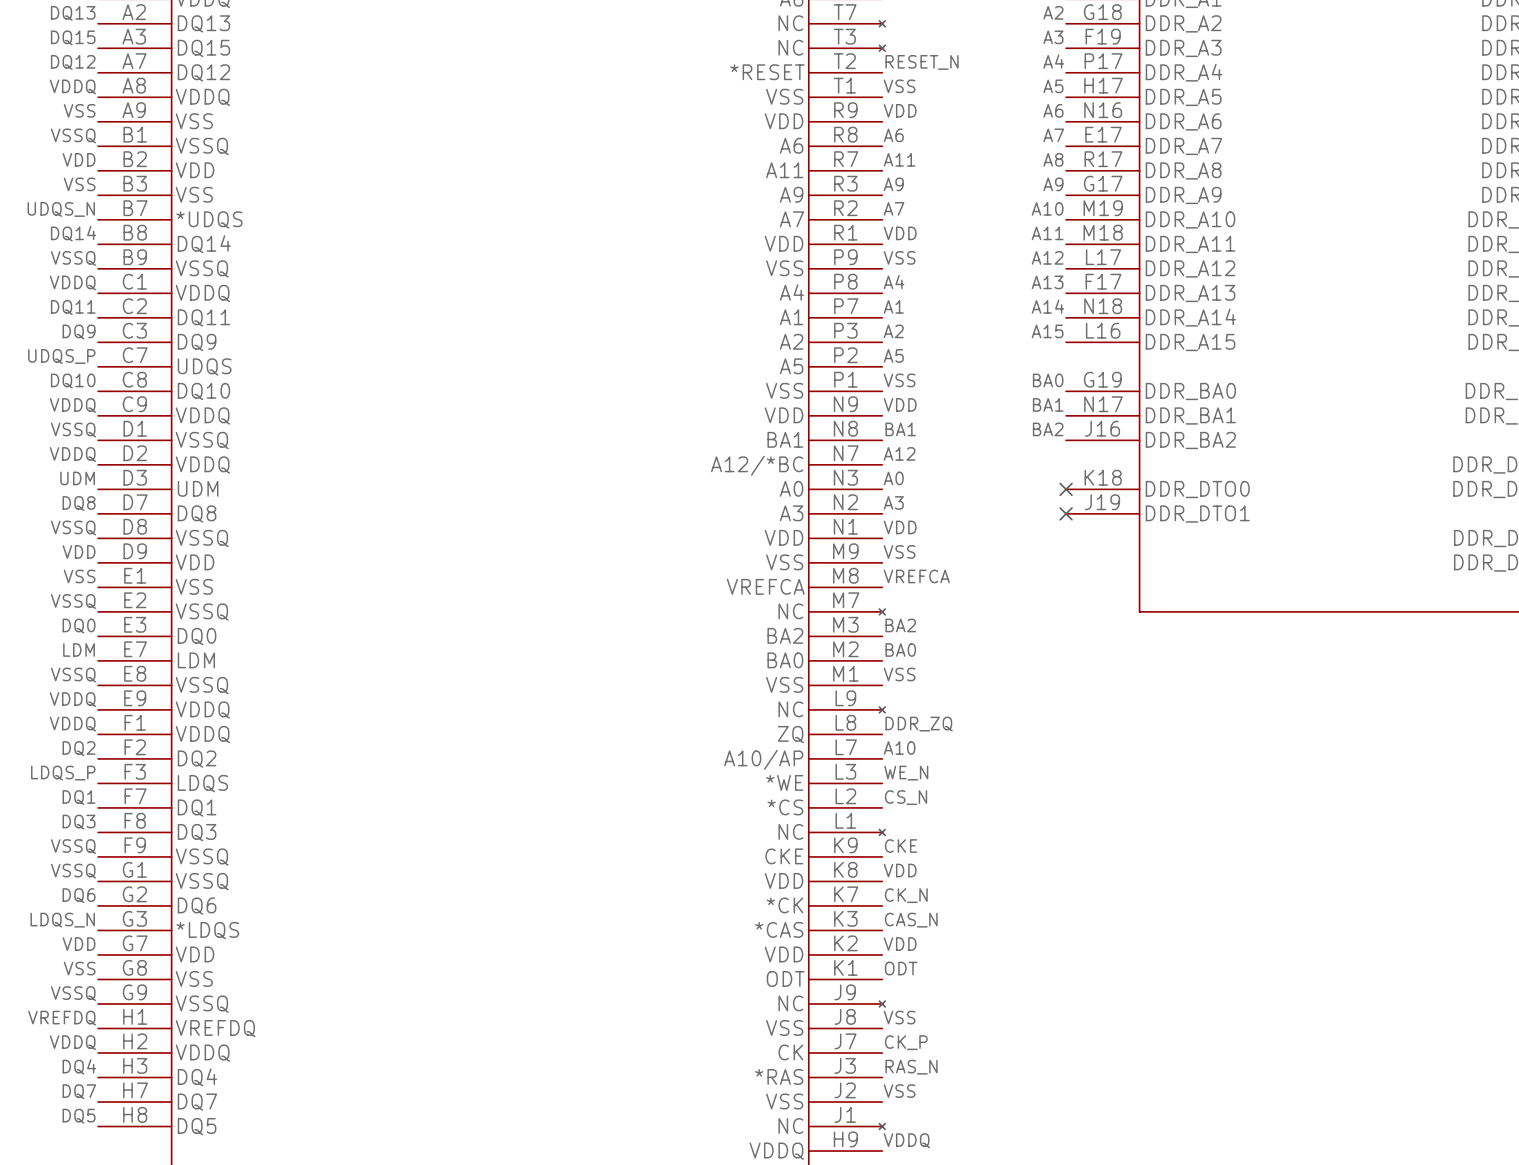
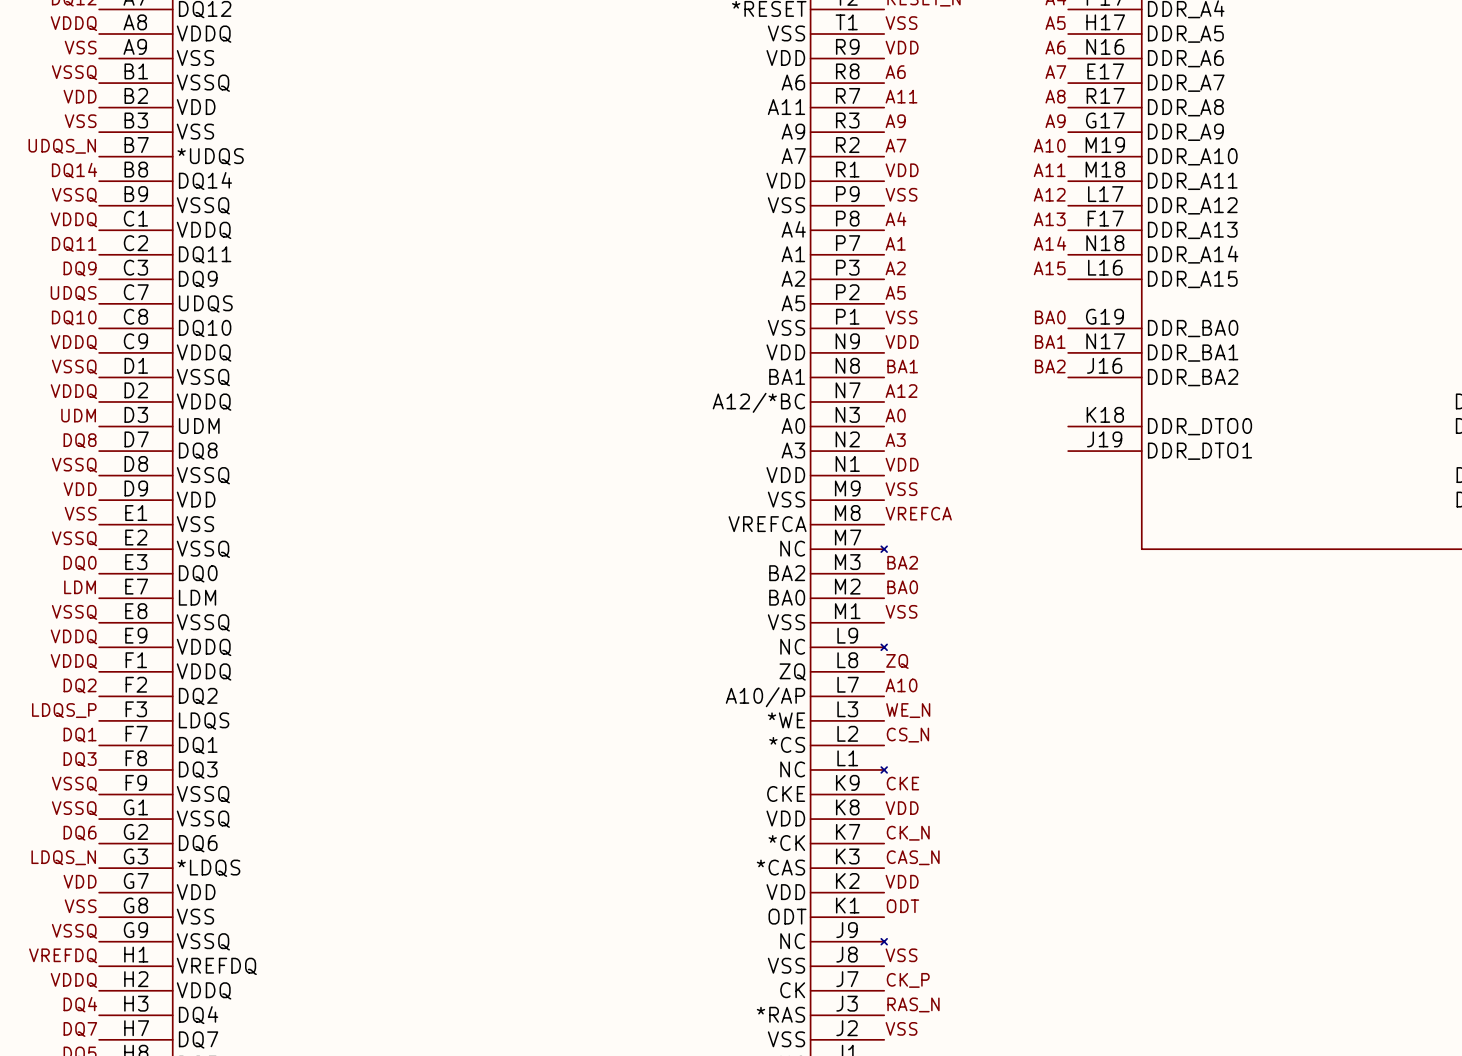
label: UDQS_P (61, 356) -> UDQS (73, 293)
no-connect mark: (1066, 489) -> none
no-connect mark: (1066, 513) -> none
label: DDR_ZQ (919, 724) -> ZQ (897, 661)

